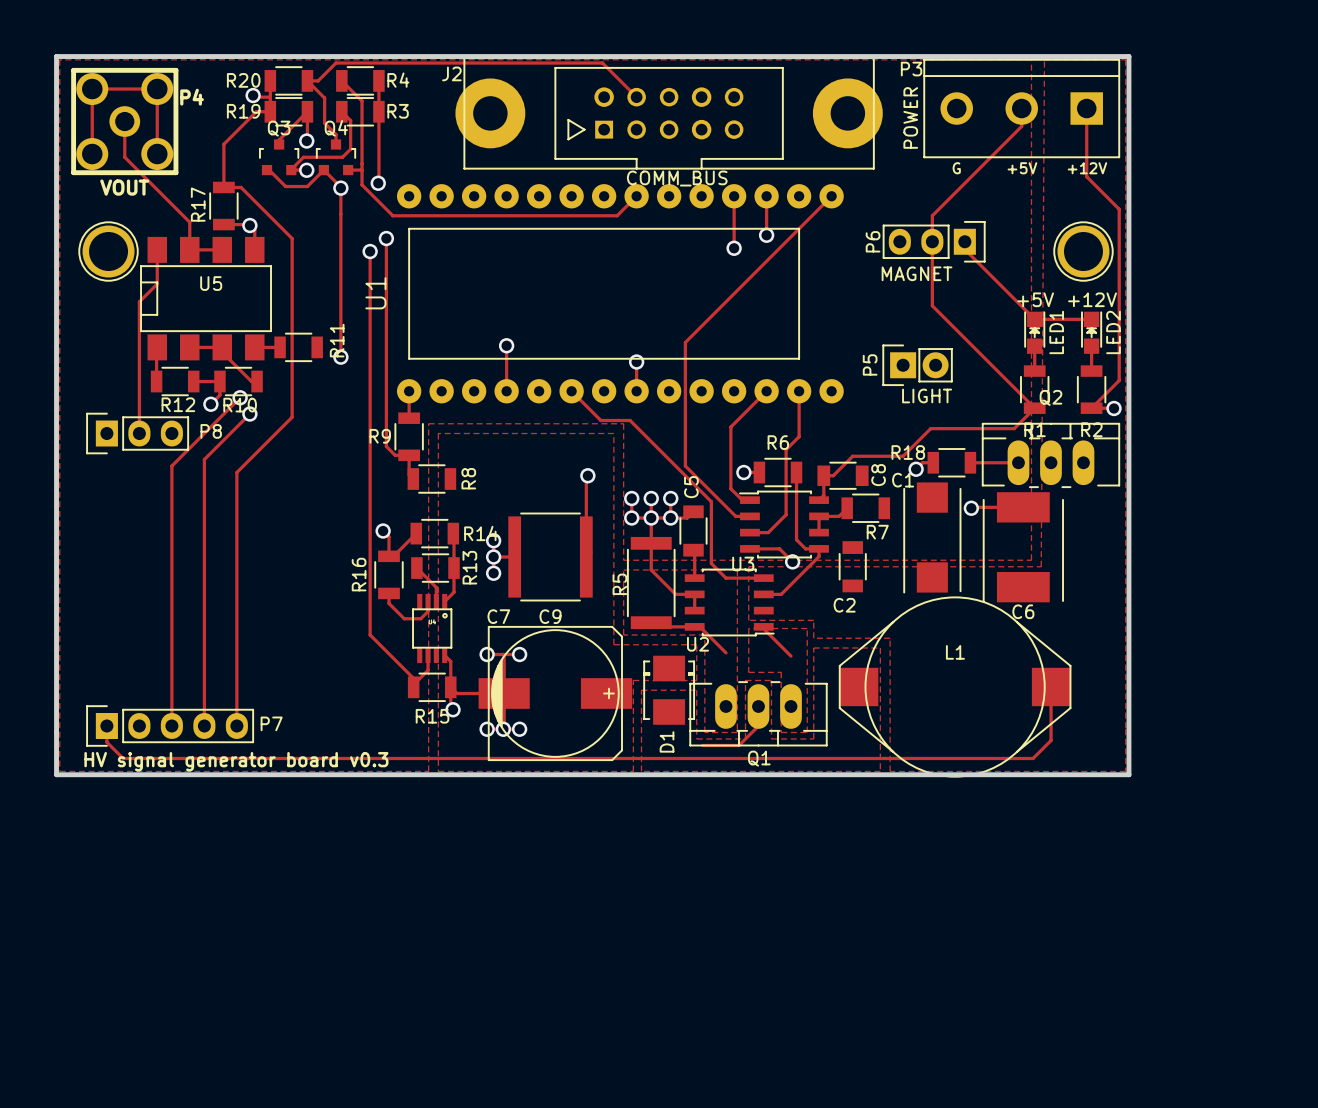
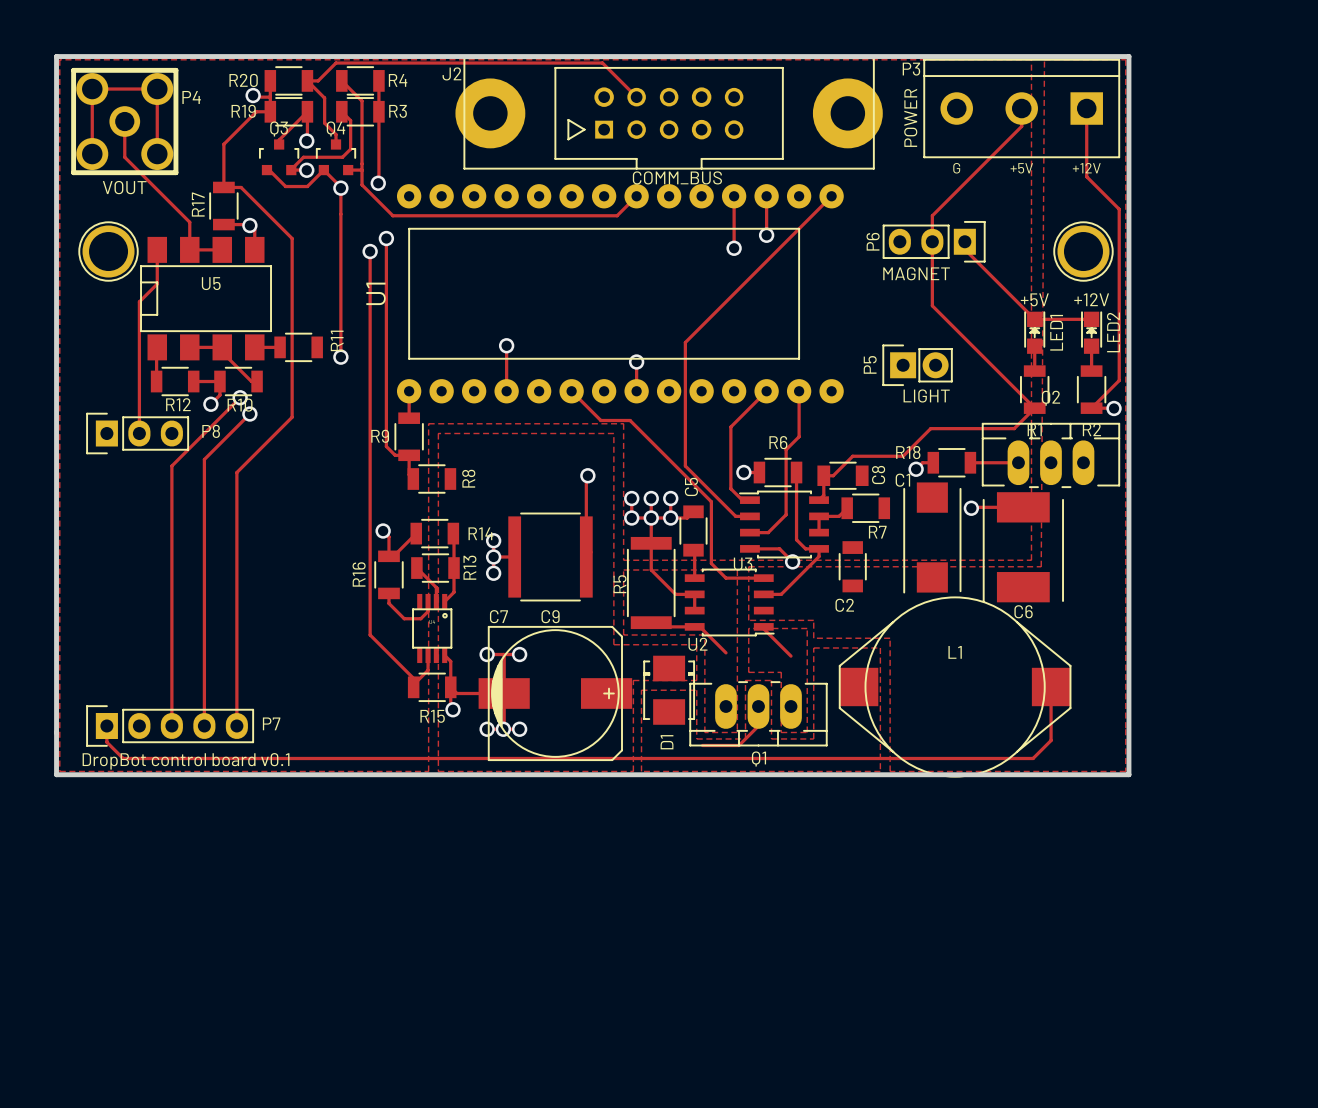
text: HV signal generator board v0.3 (236, 761) -> DropBot control board v0.1 (186, 761)

